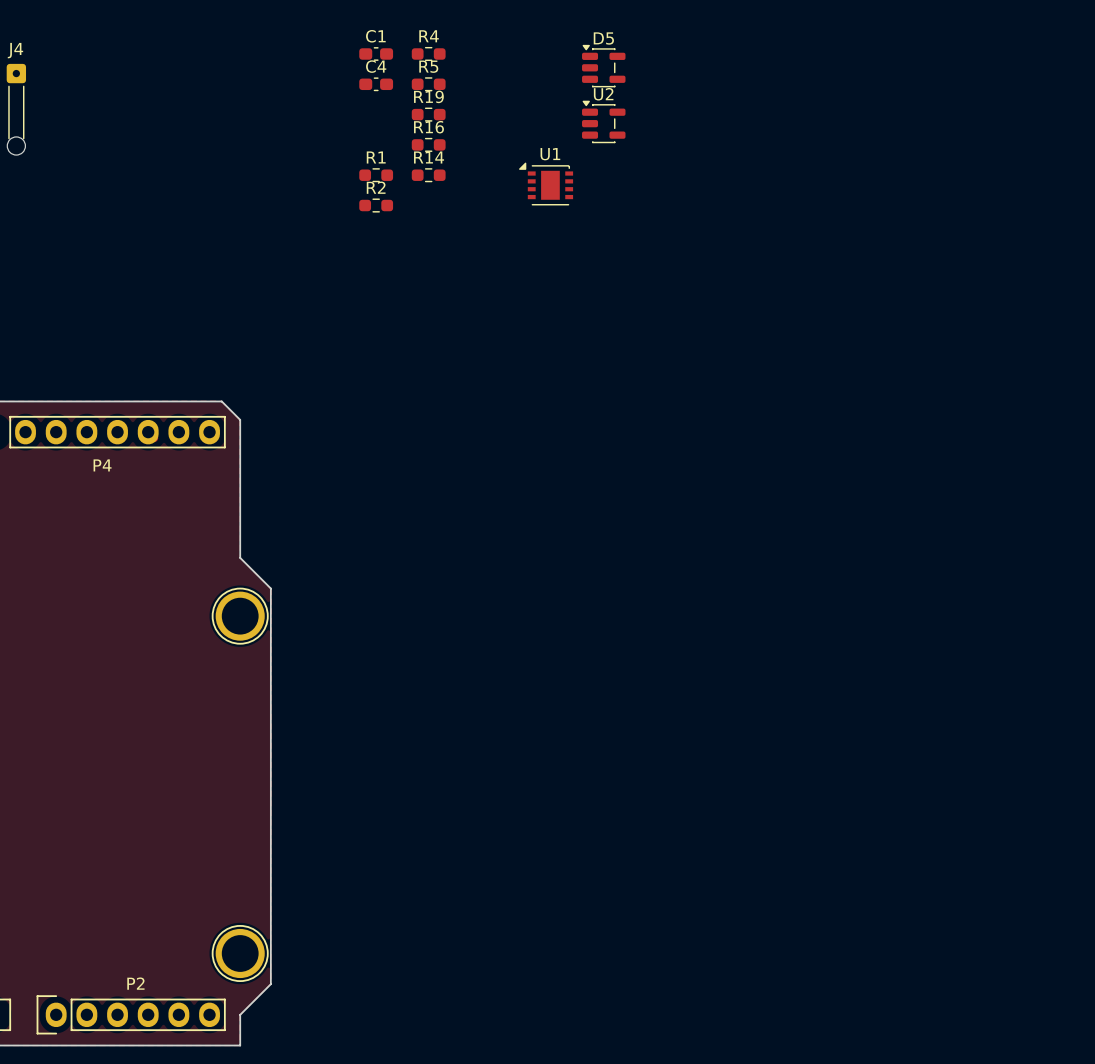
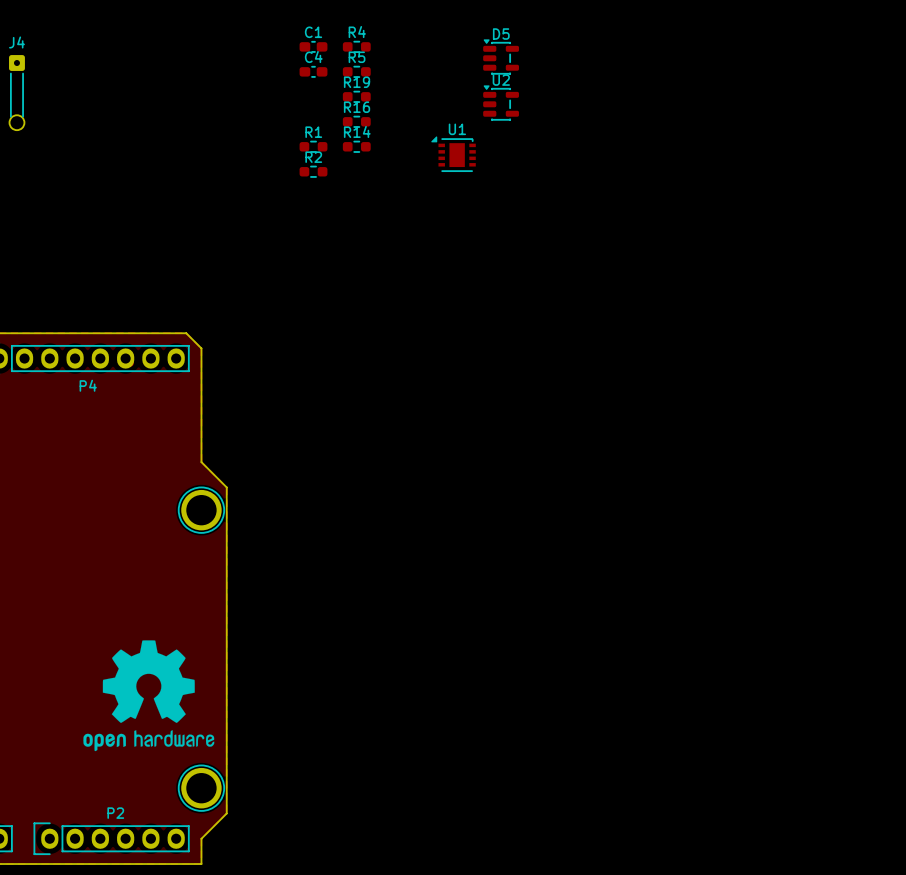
drawing: none -> [83, 640, 215, 752]

